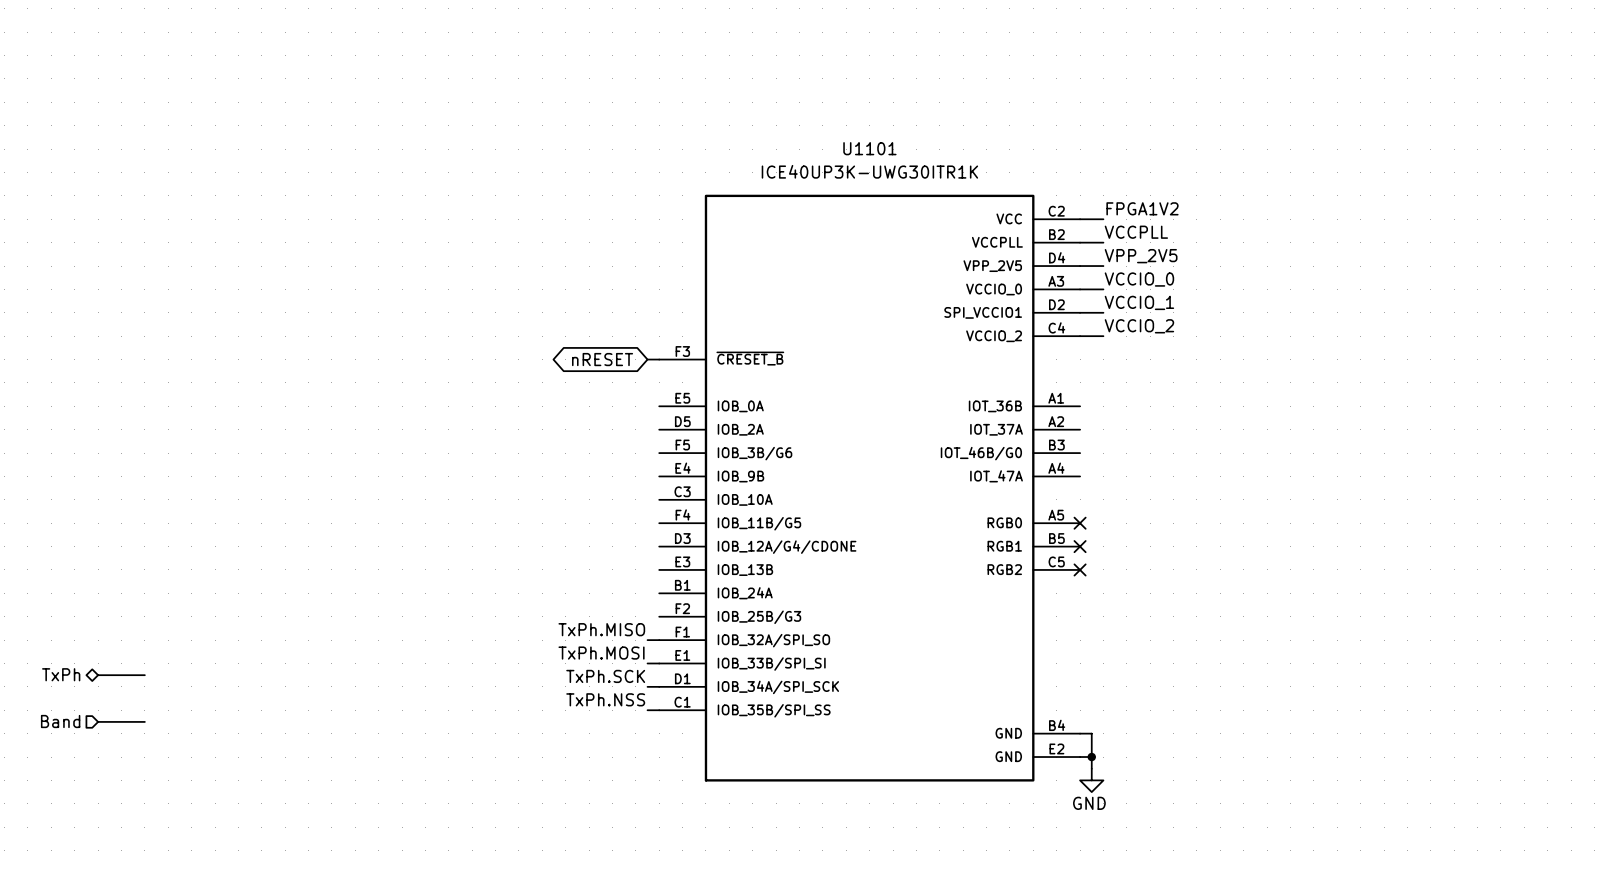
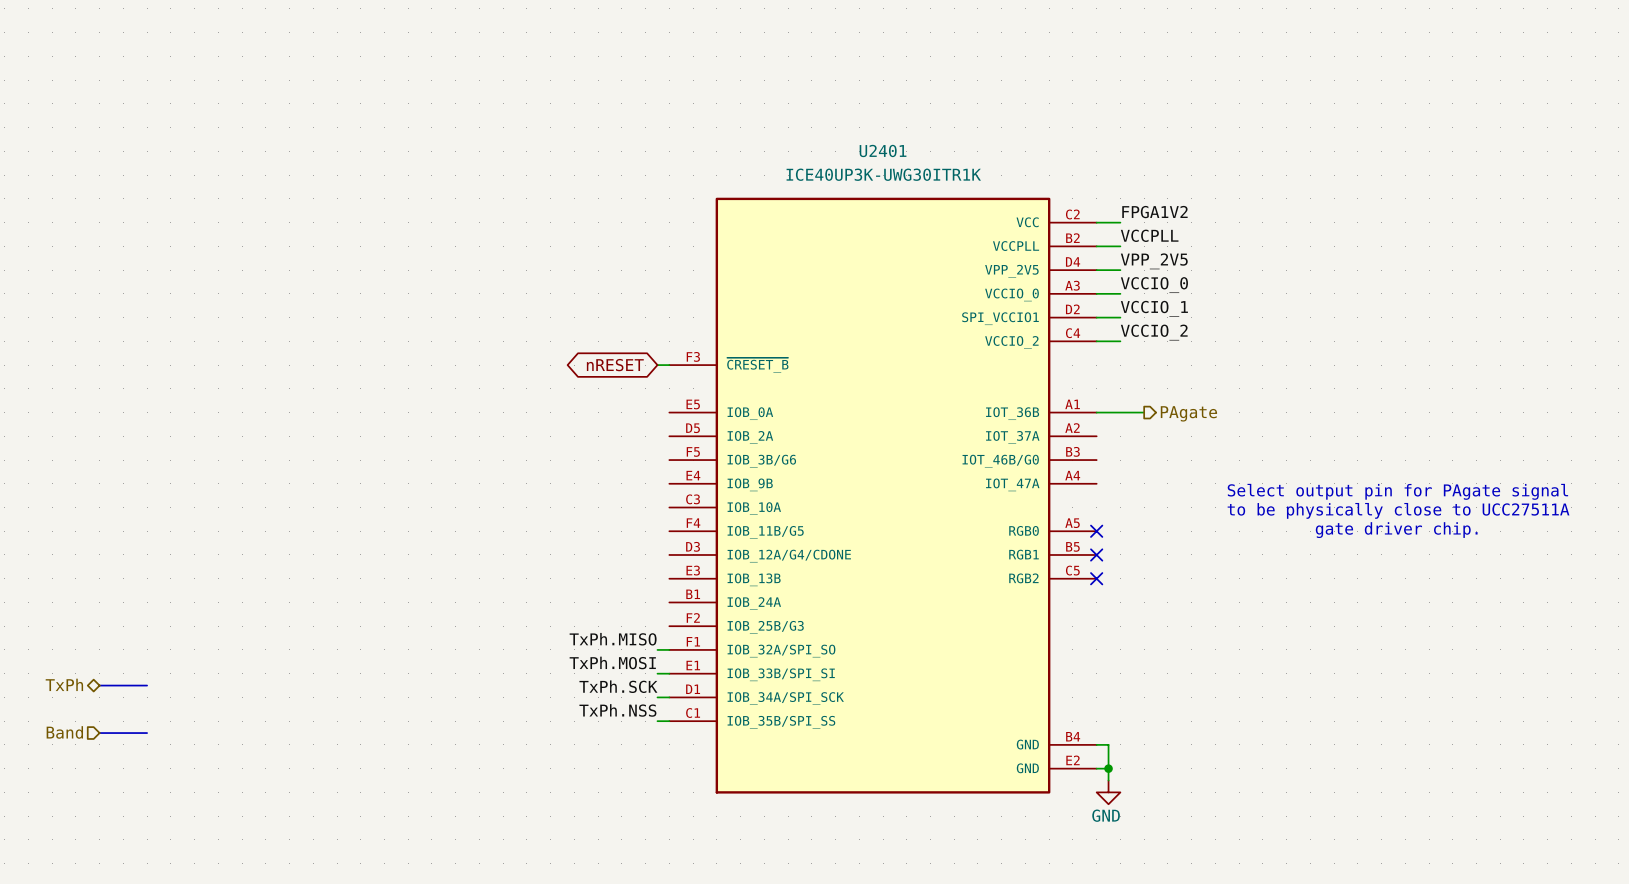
U1101 name: U1101 (869, 148) -> U2401 (883, 150)
wire: none -> (1096, 412) (1144, 412)
hierarchical label: none -> PAgate (1188, 413)
text: none -> Select output pin for PAgate signal (1397, 491)
text: none -> to be physically close to UCC27511A (1398, 510)
text: none -> gate driver chip. (1396, 530)

